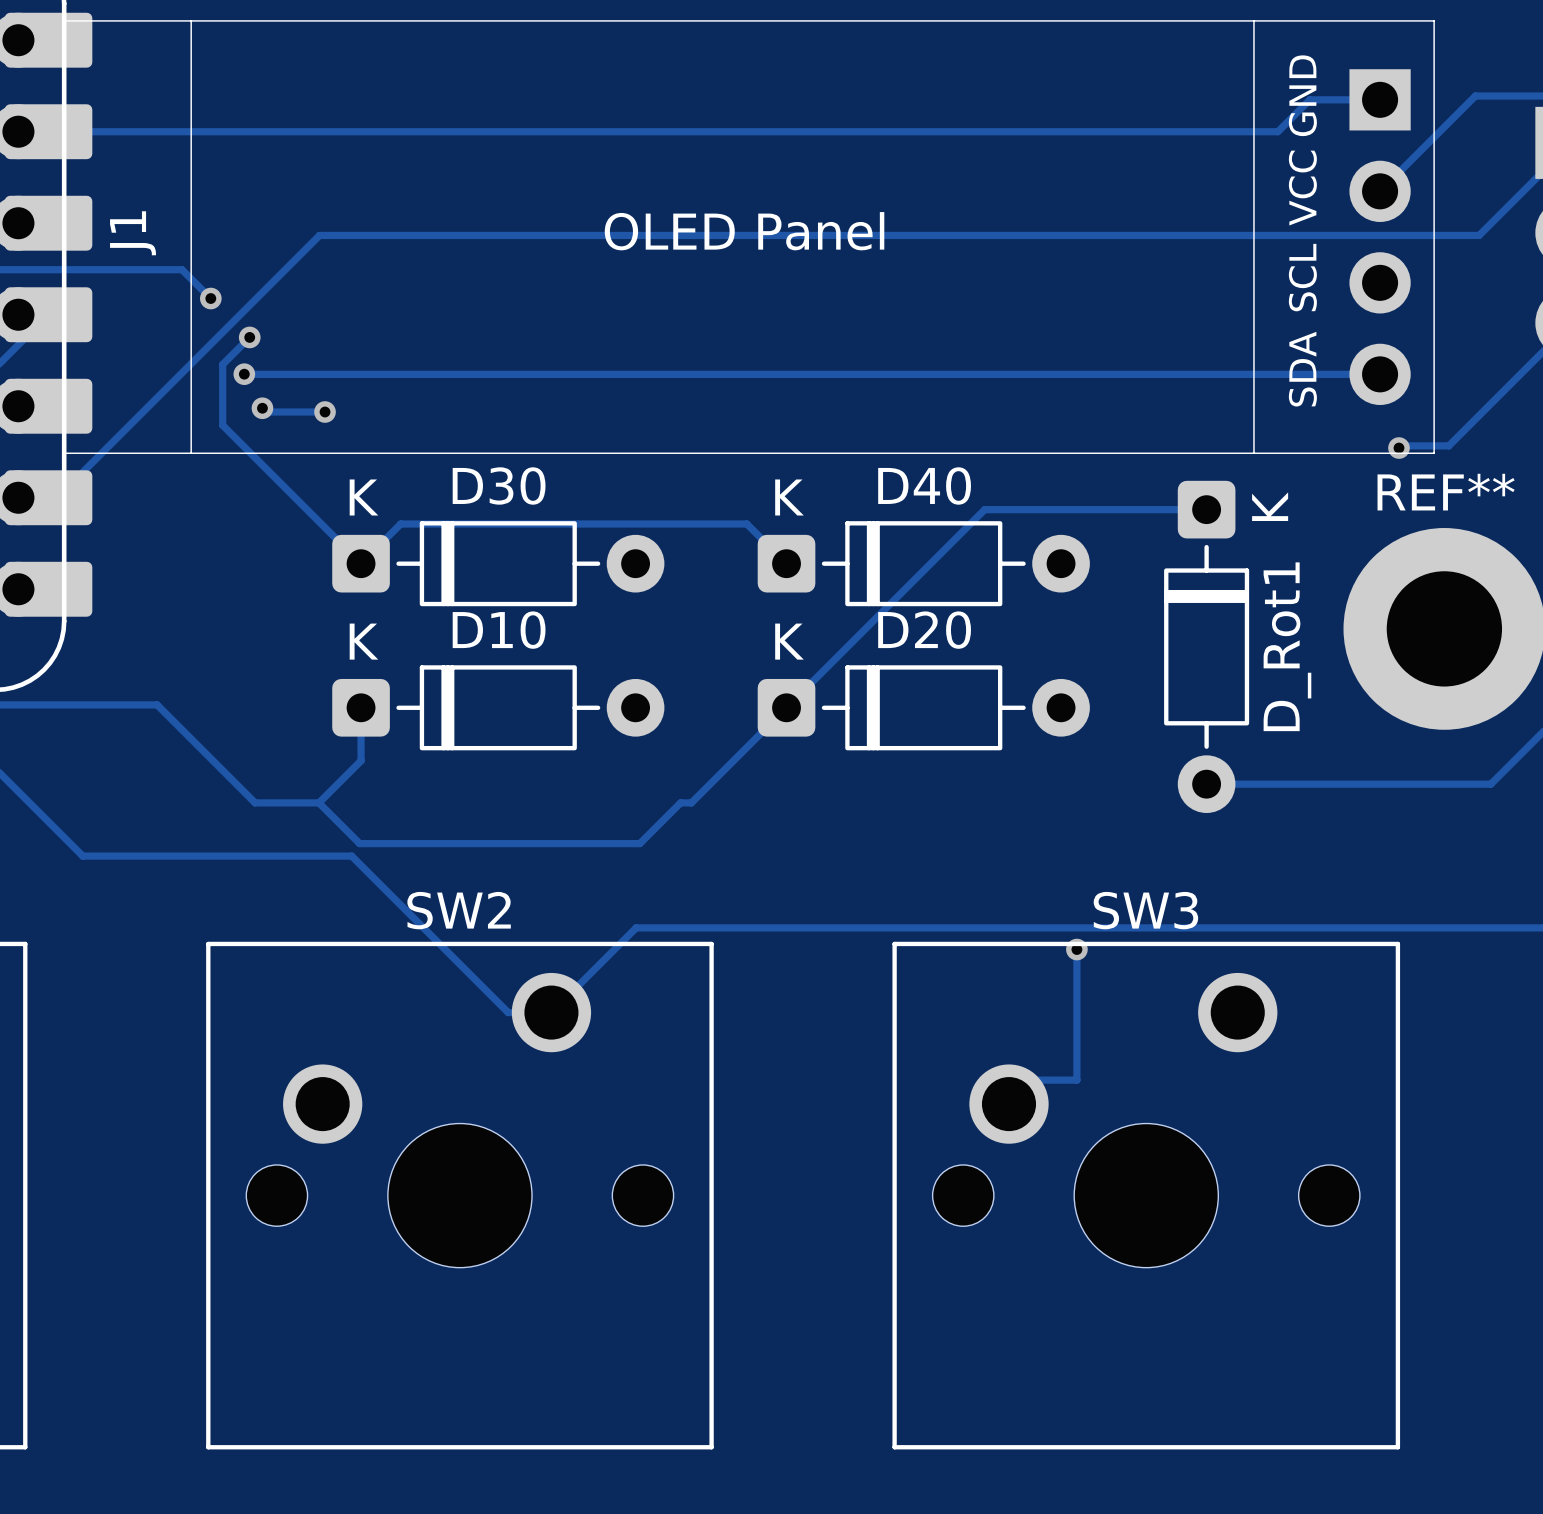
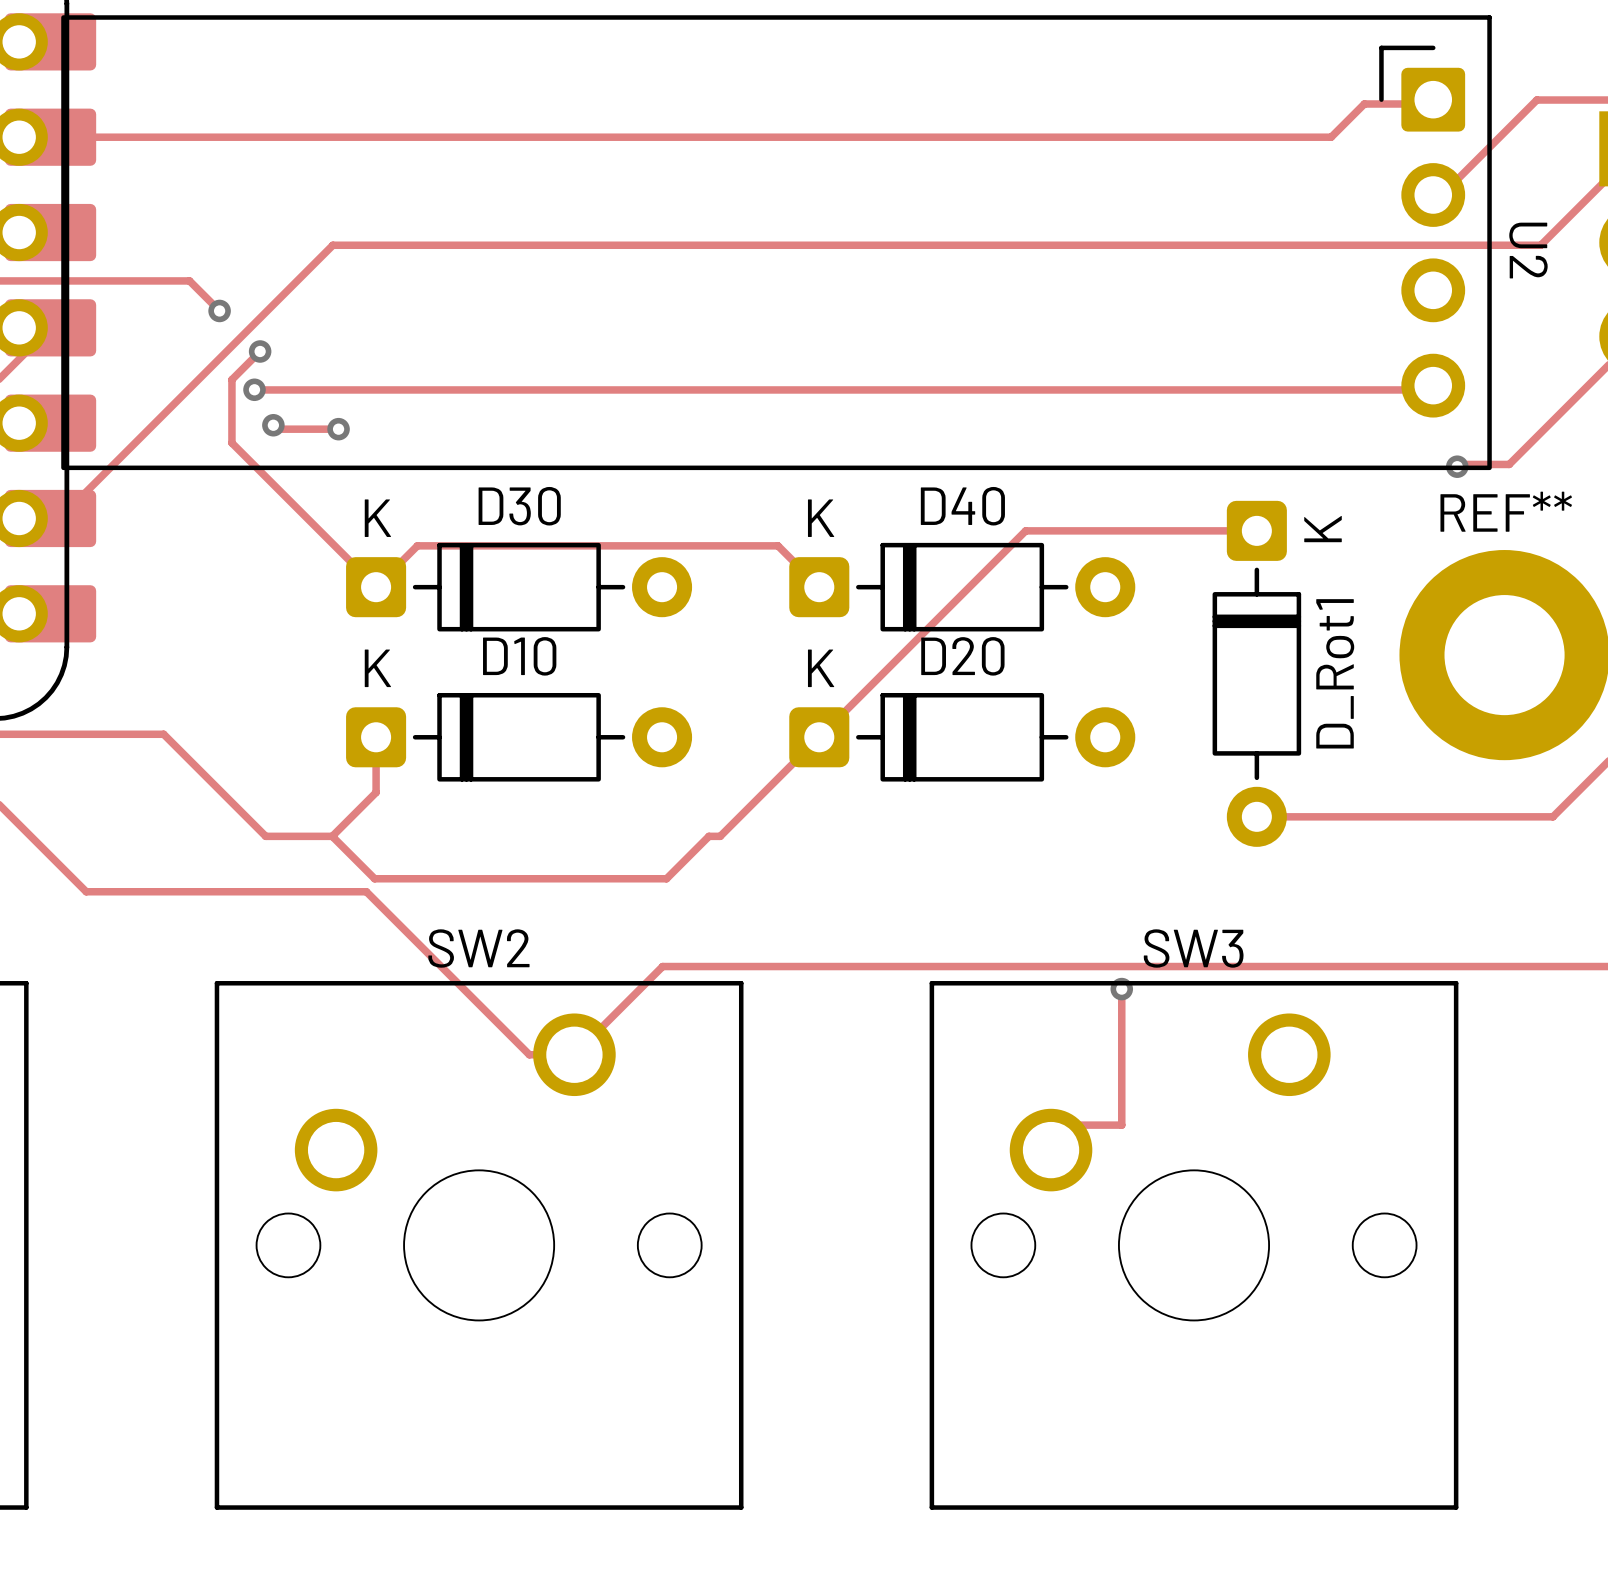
U2: none -> (776, 242)
J1: (749, 237) -> none

